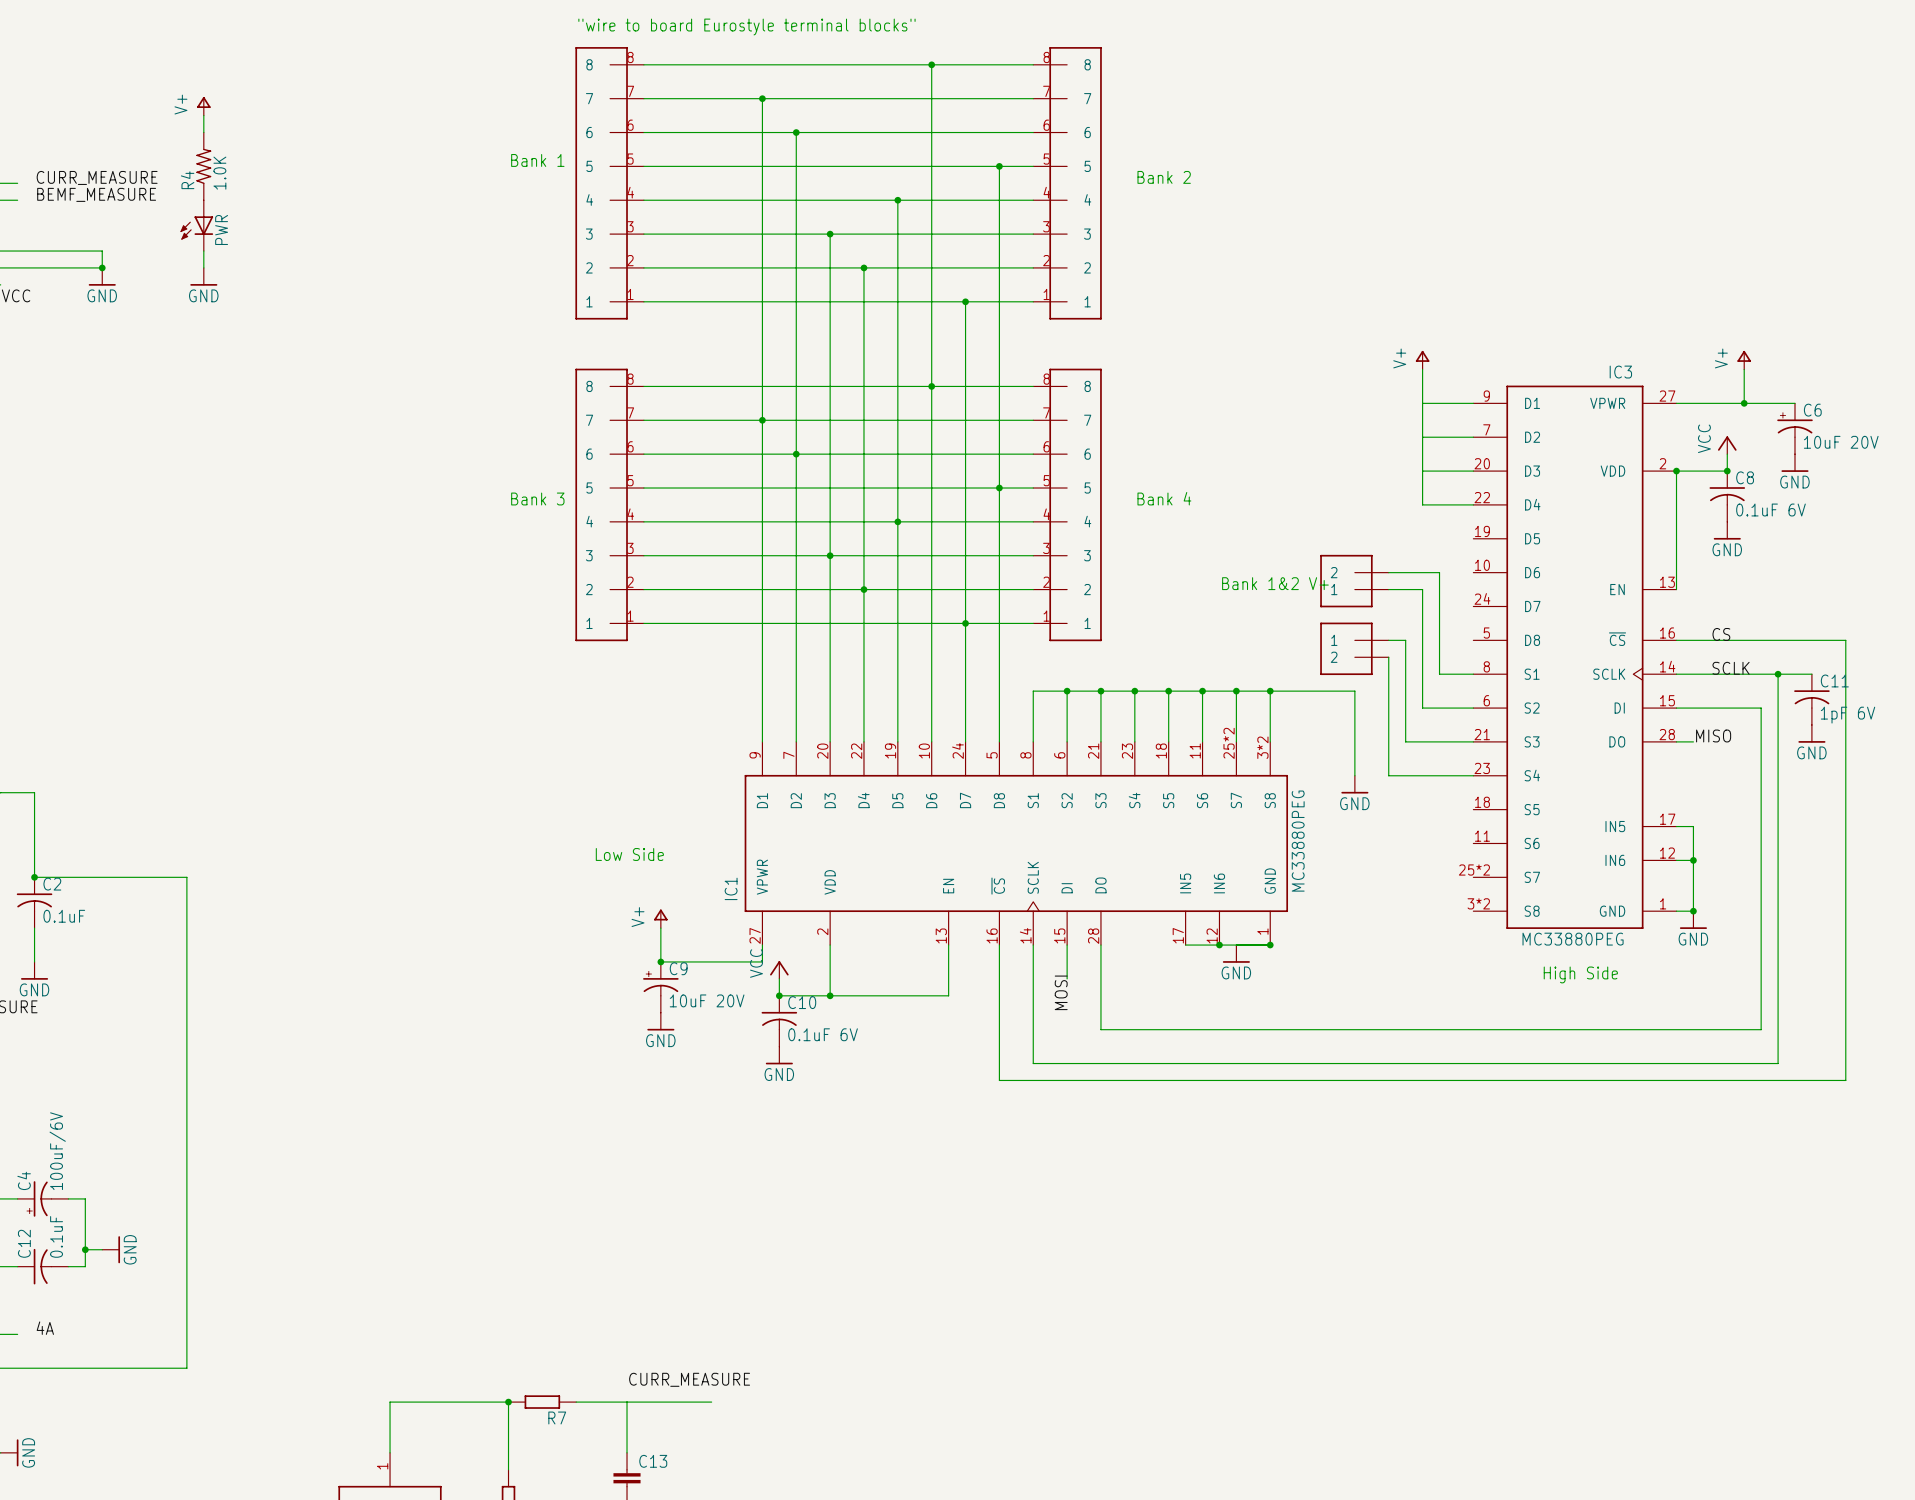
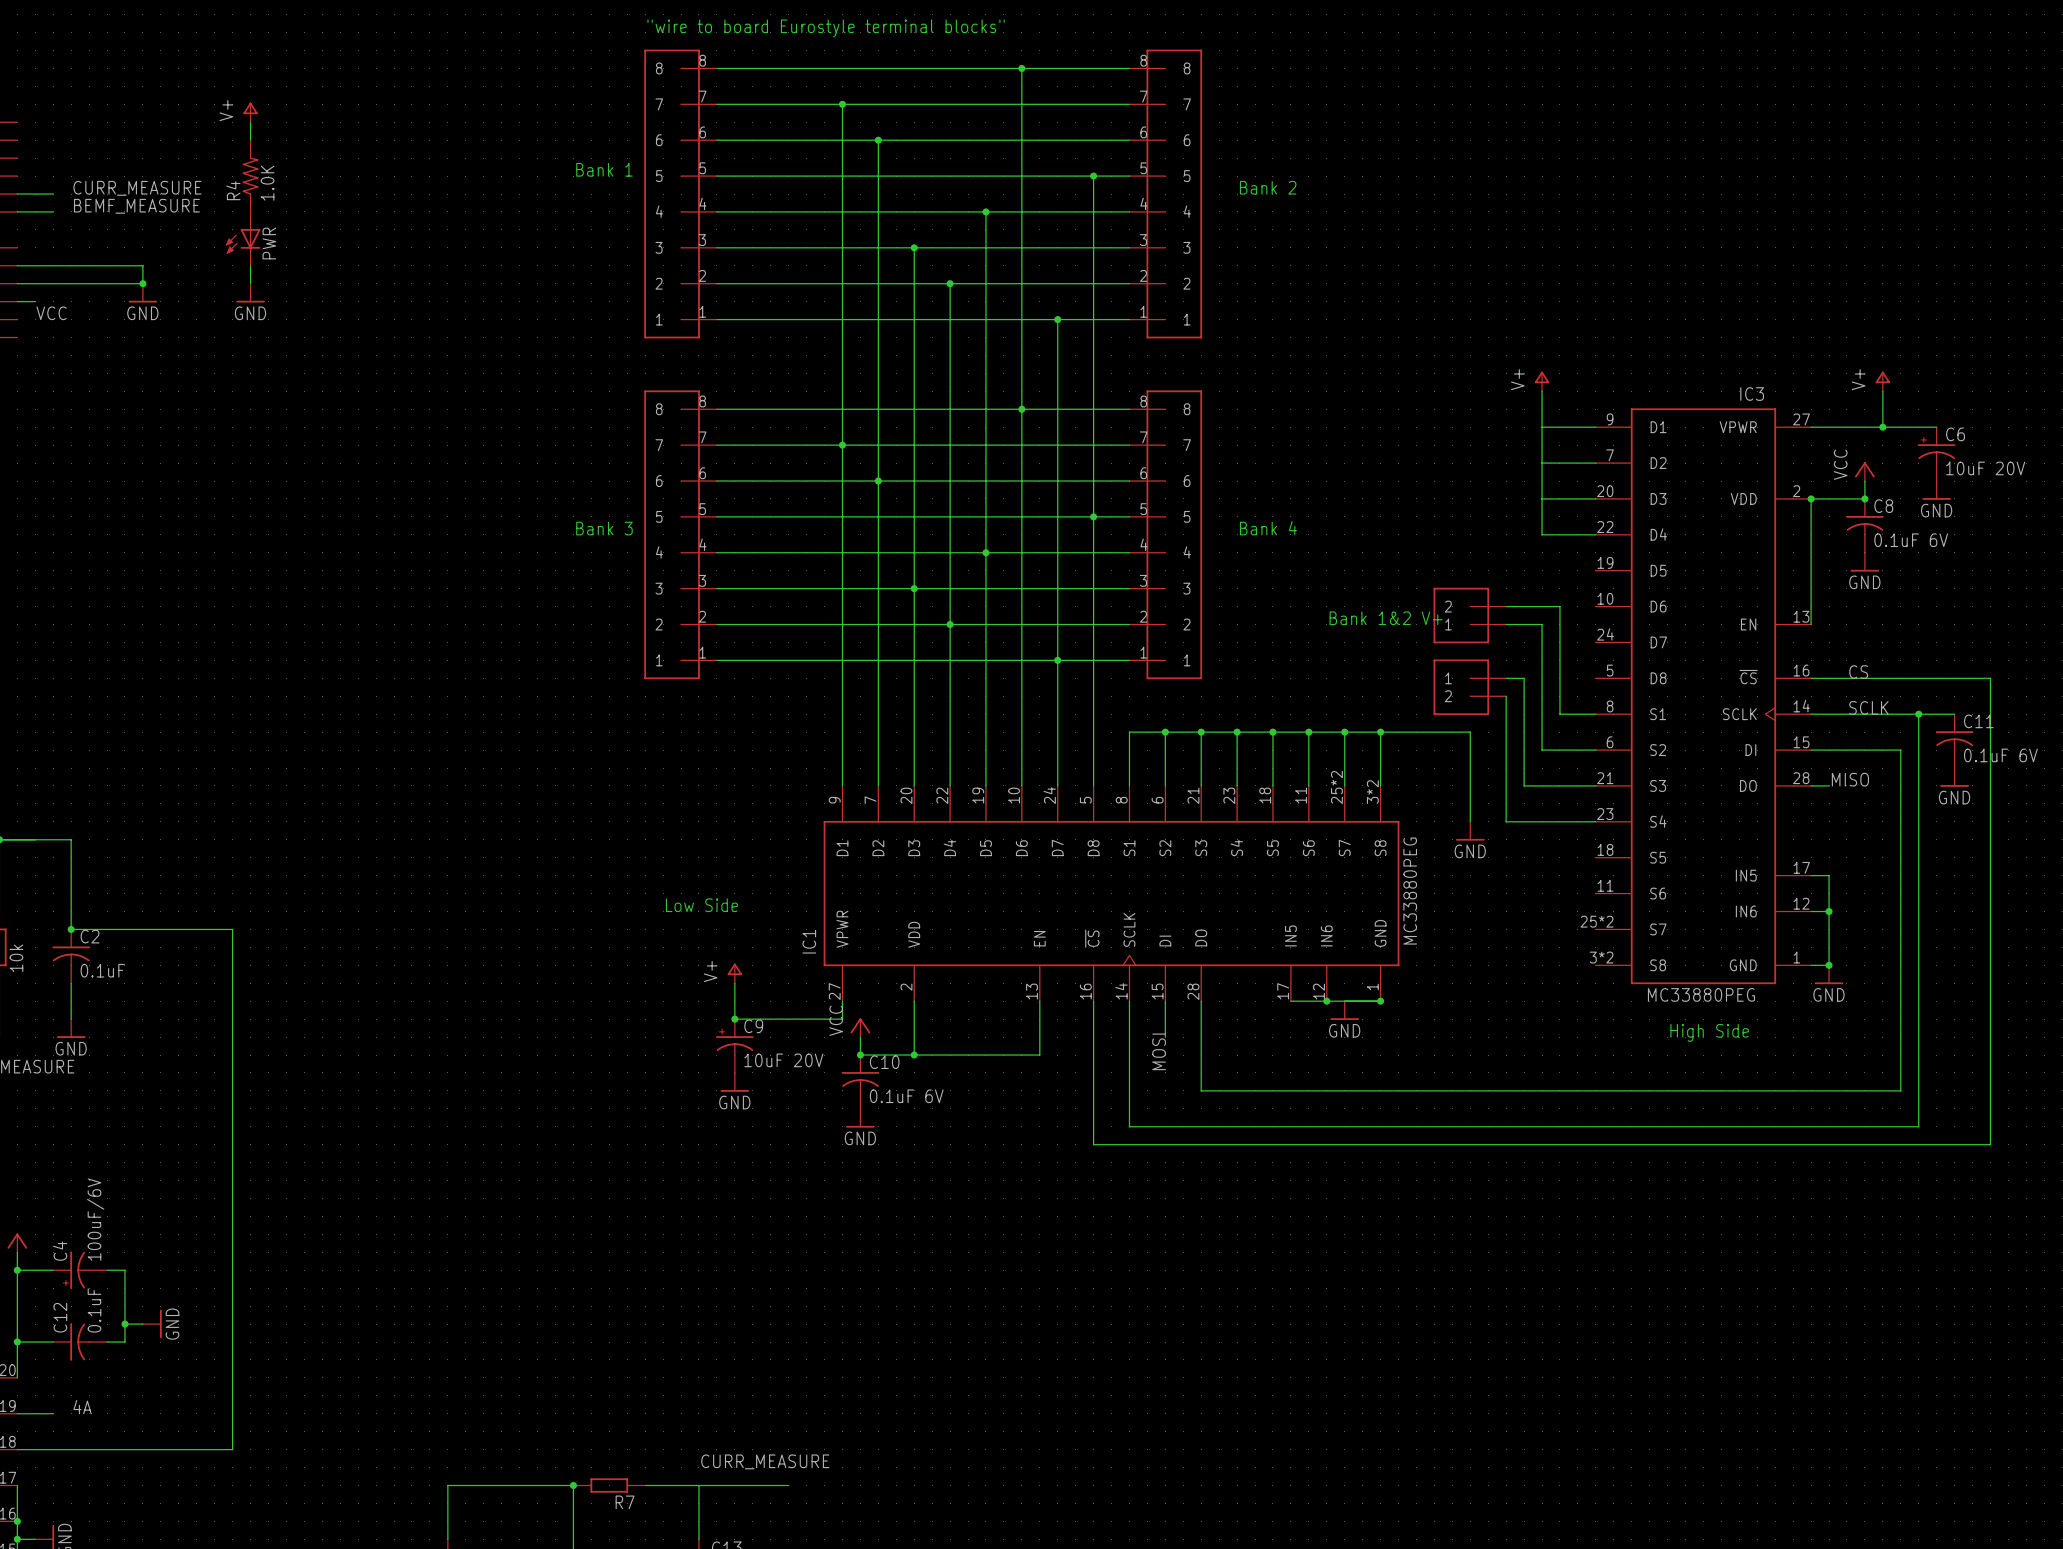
C11 value: 1pF 6V (1848, 715) -> 0.1uF 6V (2000, 755)

